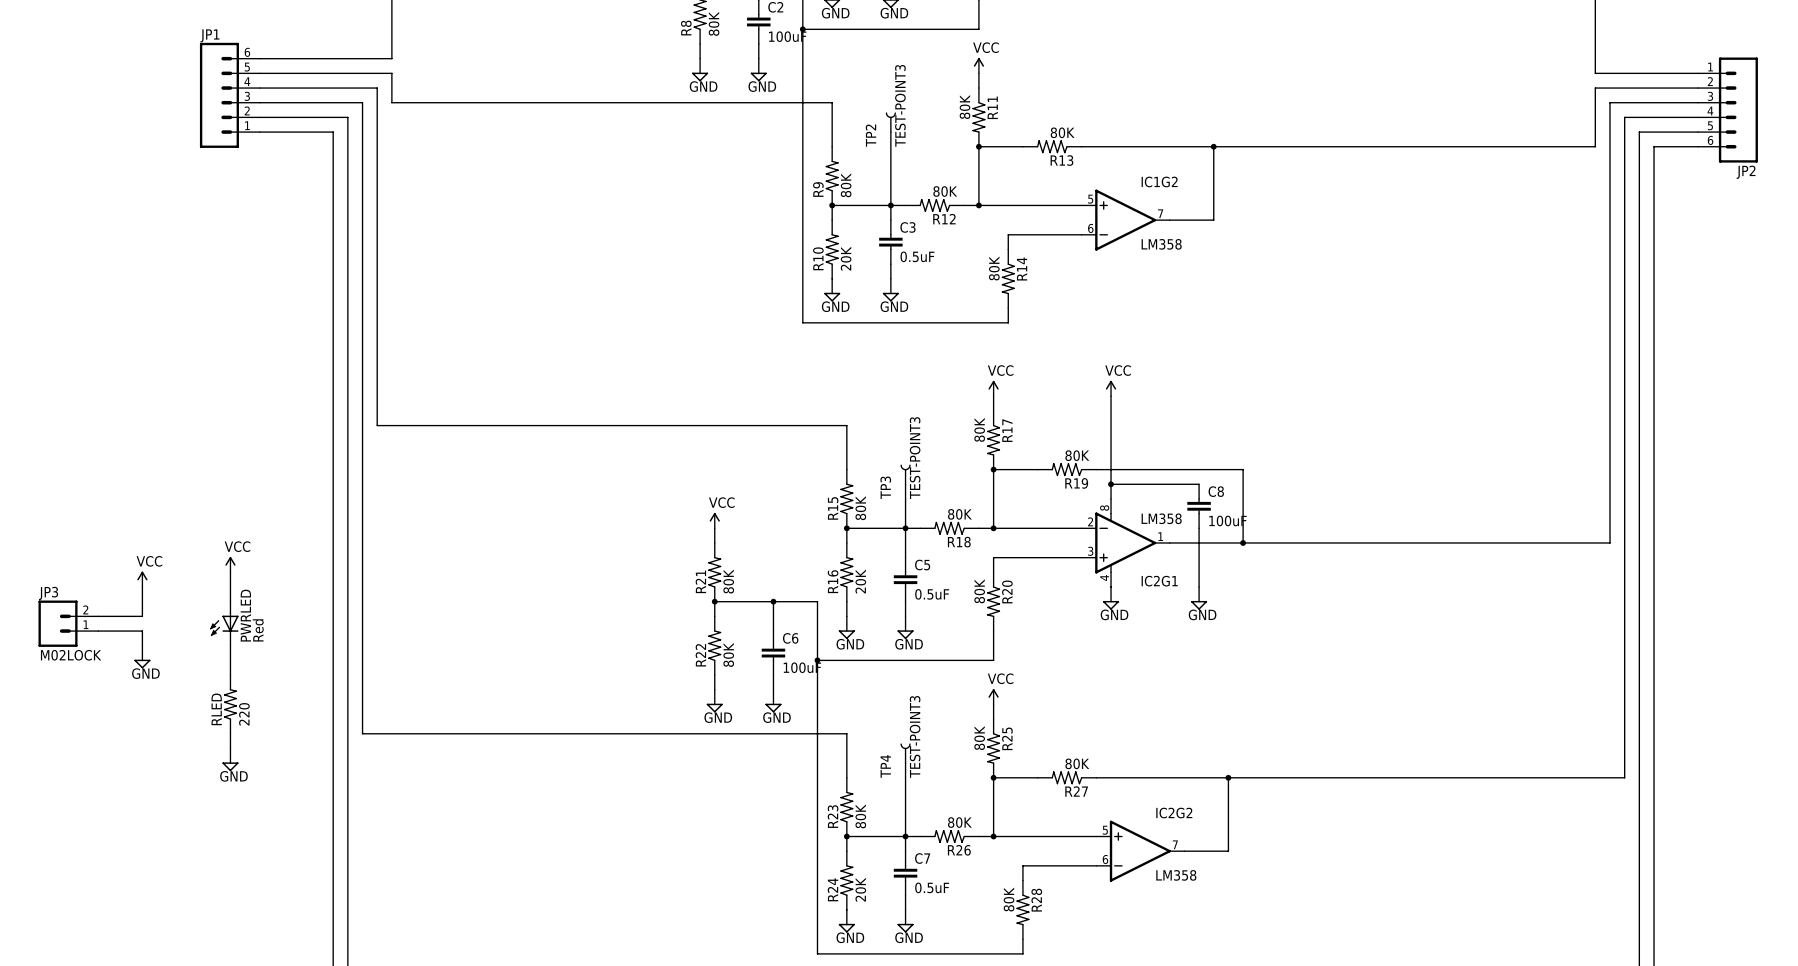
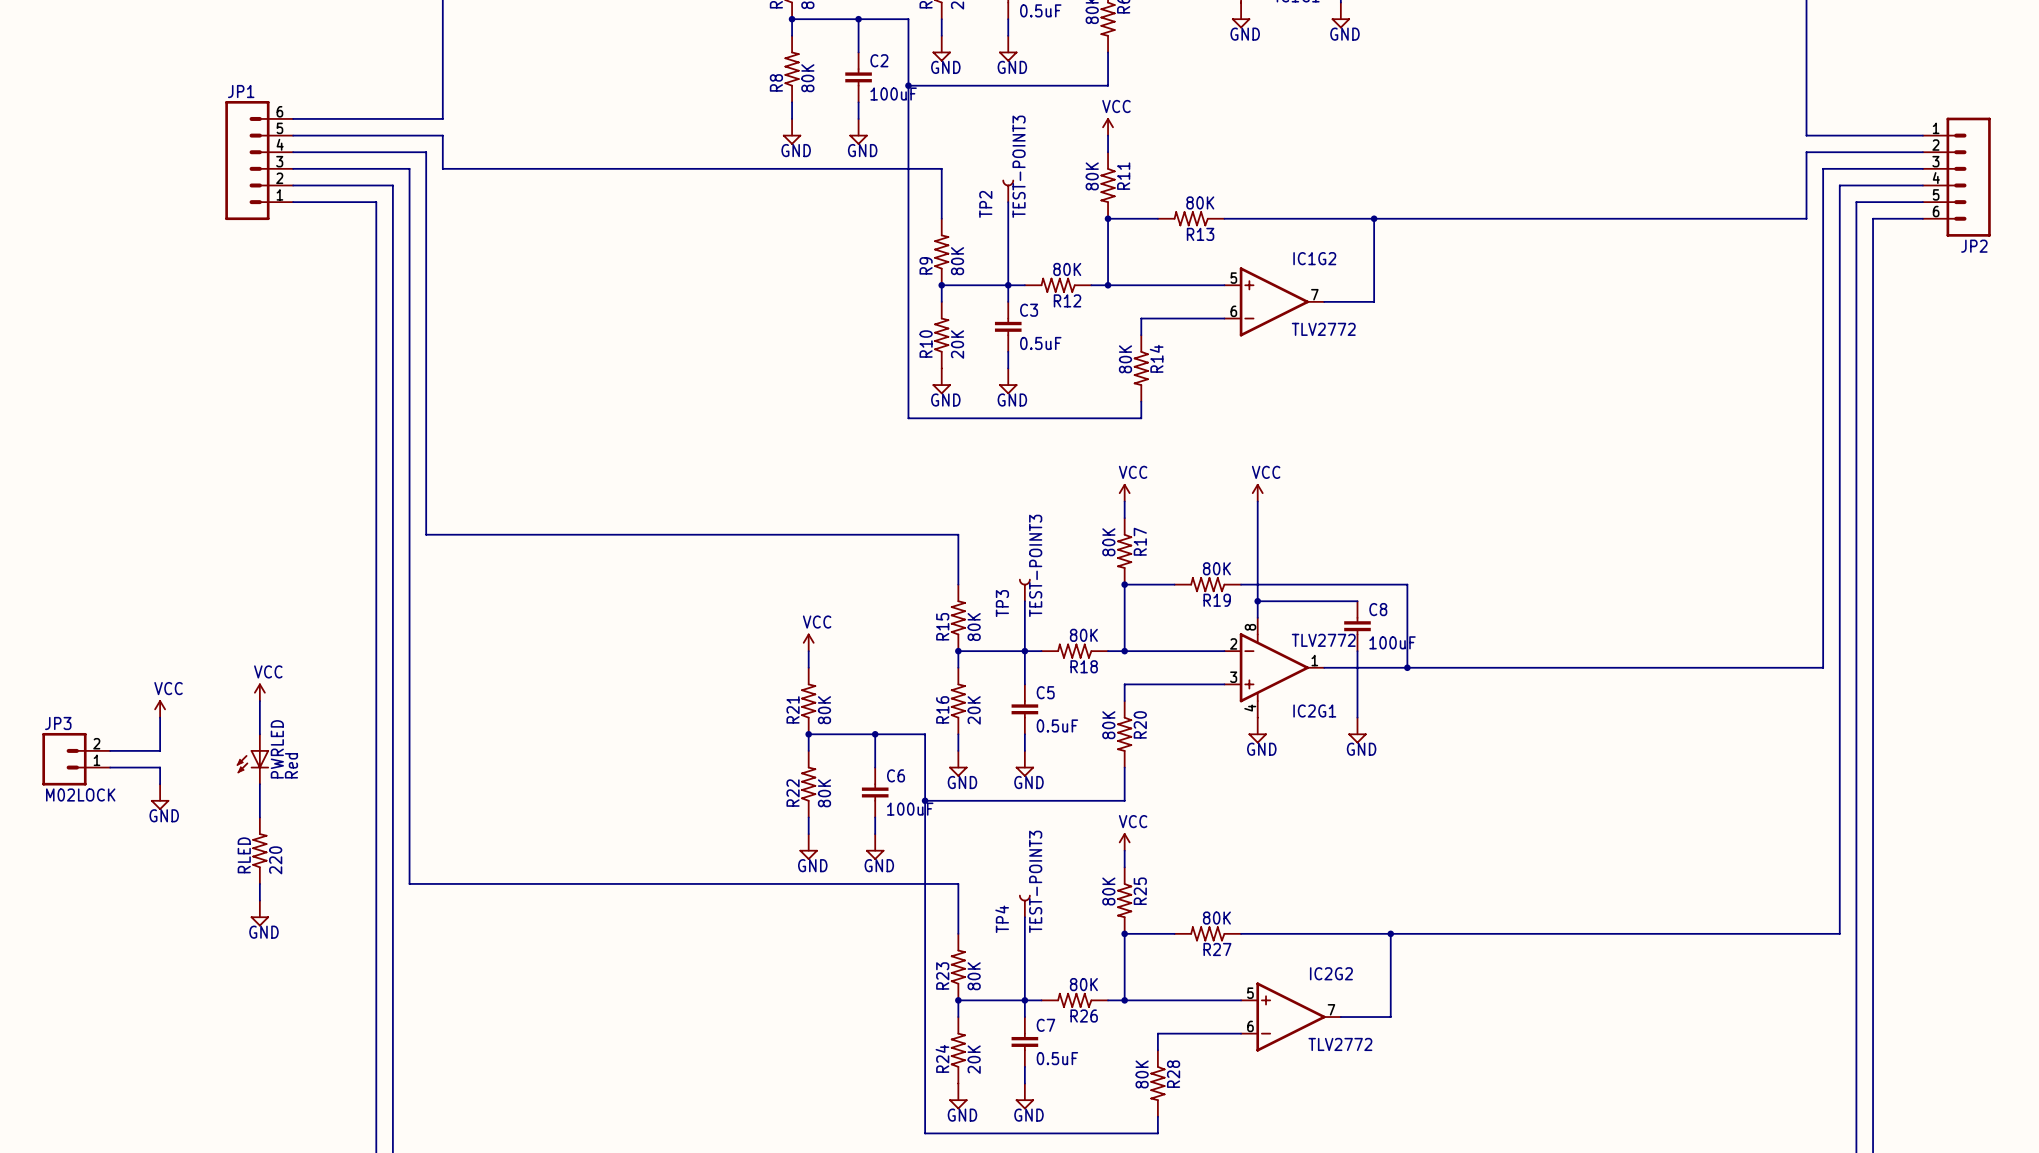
IC1G2 value: LM358 (1161, 244) -> TLV2772 (1323, 329)
IC2G1 value: LM358 (1161, 518) -> TLV2772 (1323, 640)
IC2G2 value: LM358 (1176, 875) -> TLV2772 (1340, 1044)

